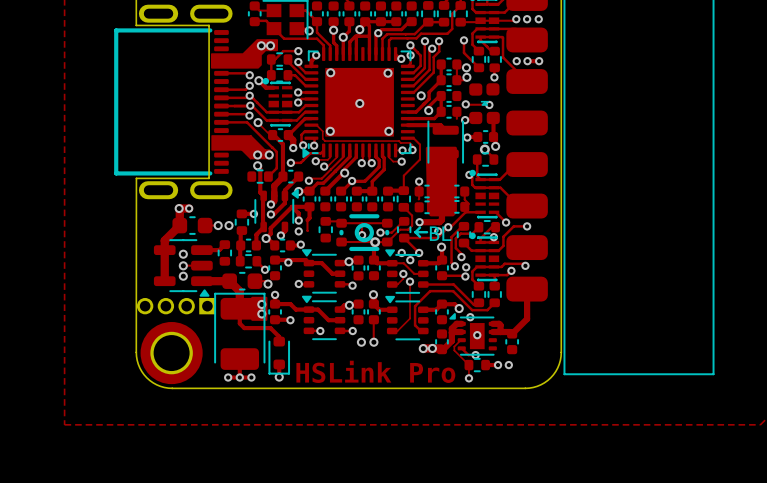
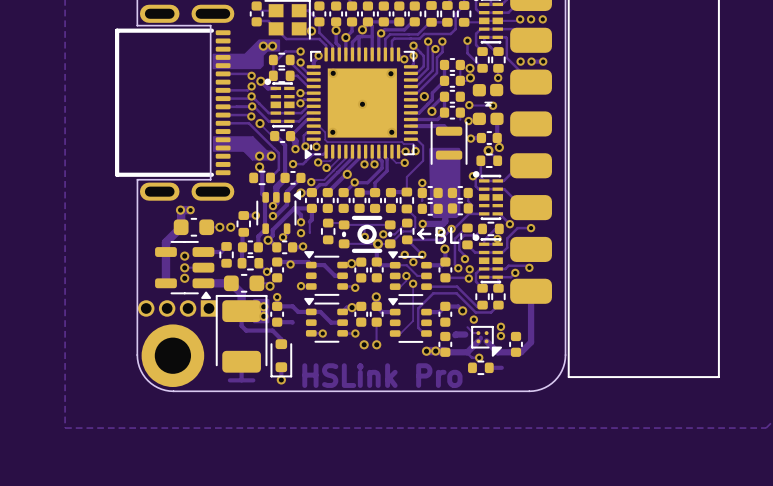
part footprint: [449, 313, 497, 356] -> [471, 325, 503, 357]
track: (527, 319) (512, 333) (510, 332) (492, 332) -> (531, 321) (531, 342) (521, 352) (497, 352) (486, 341)
via: (290, 320) -> none
track: (461, 323) (456, 323) (451, 328) (451, 340) (443, 349) -> (478, 341) (467, 352) (446, 352)
track: (492, 323) (500, 325) (500, 332) -> none
track: none -> (467, 327) (473, 333) (478, 333)
via: none -> (500, 326)
via: none -> (500, 336)
via: (477, 335) -> none
track: (461, 340) (454, 346) (454, 350) (468, 365) (468, 378) -> none
via: (498, 365) -> none
via: (508, 365) -> none
via: (228, 377) -> none
via: (239, 377) -> none
via: (251, 377) -> none
via: (468, 378) -> none

